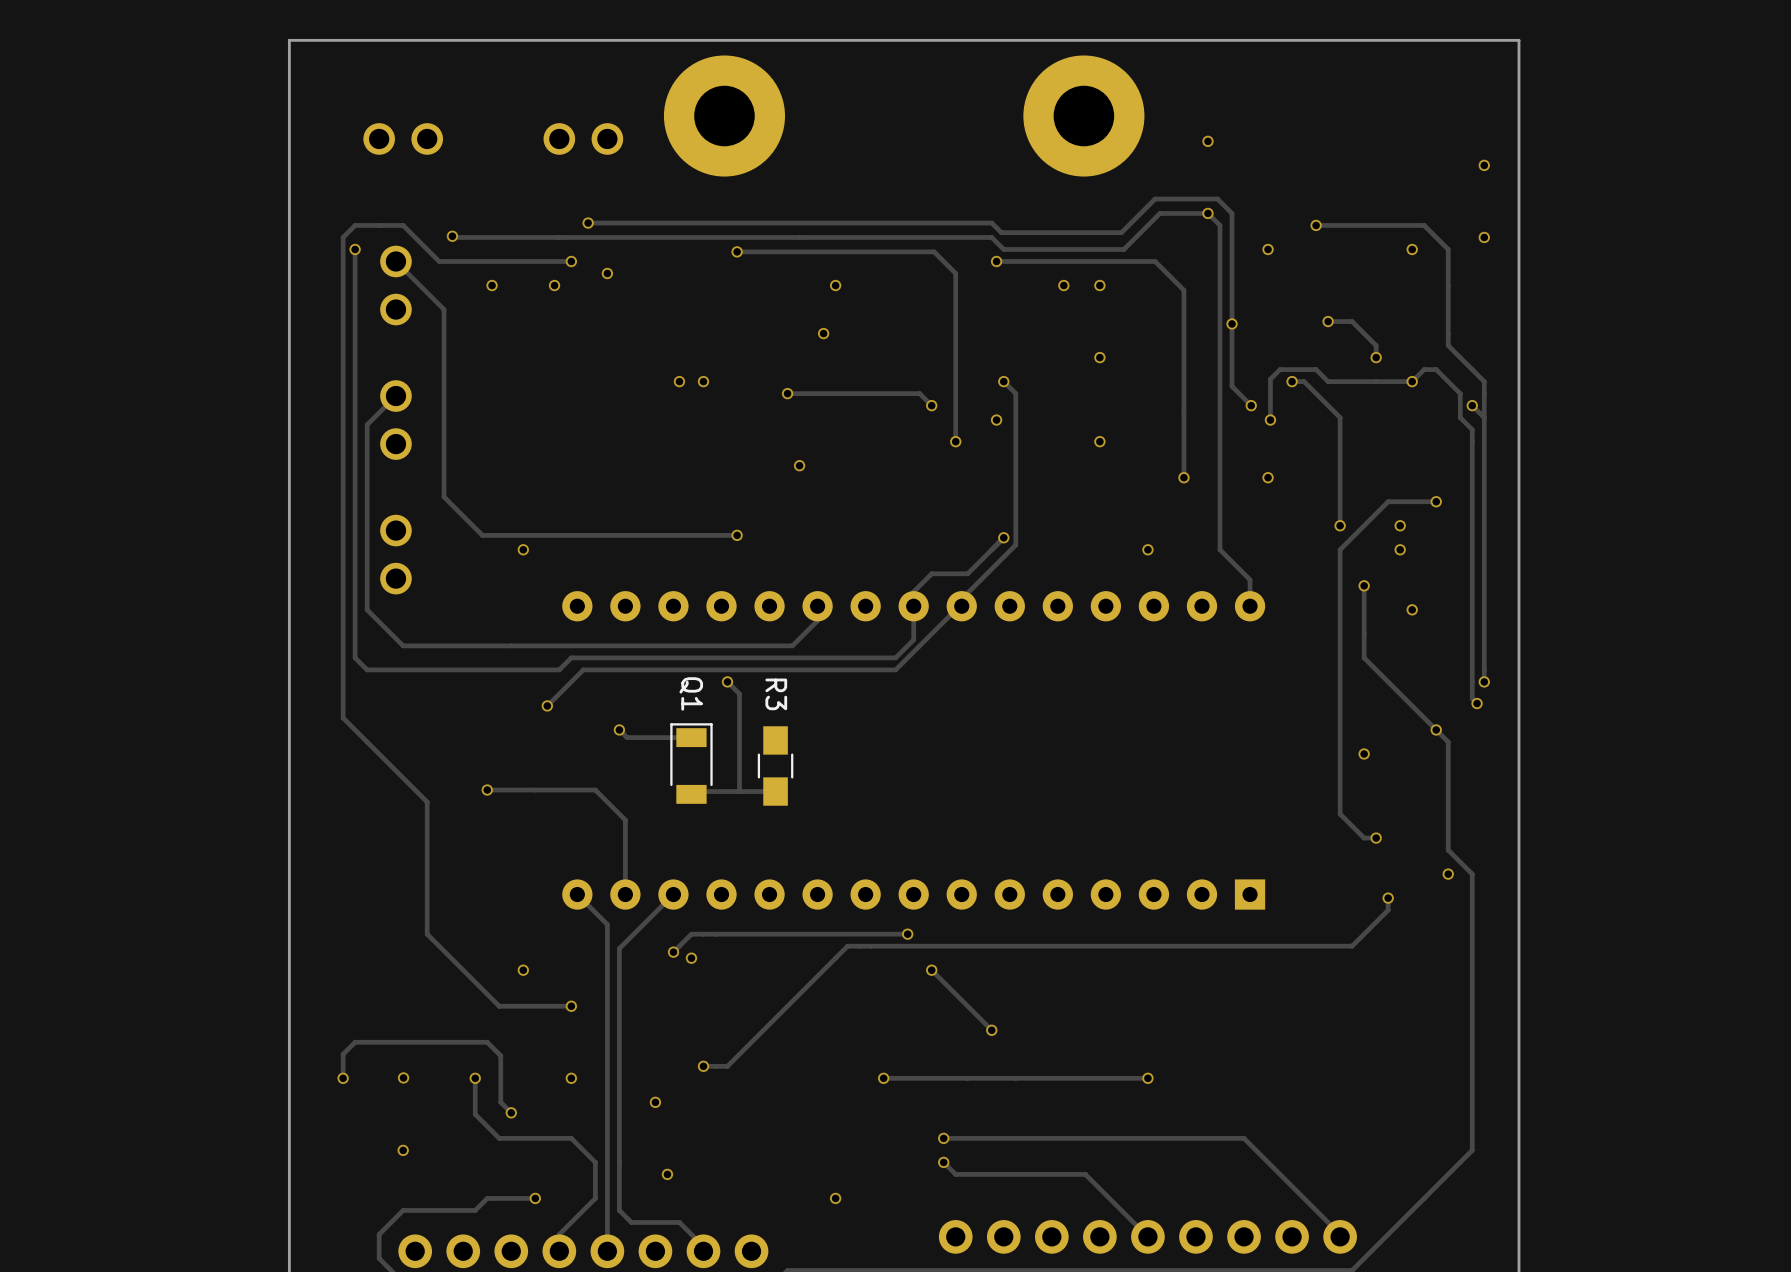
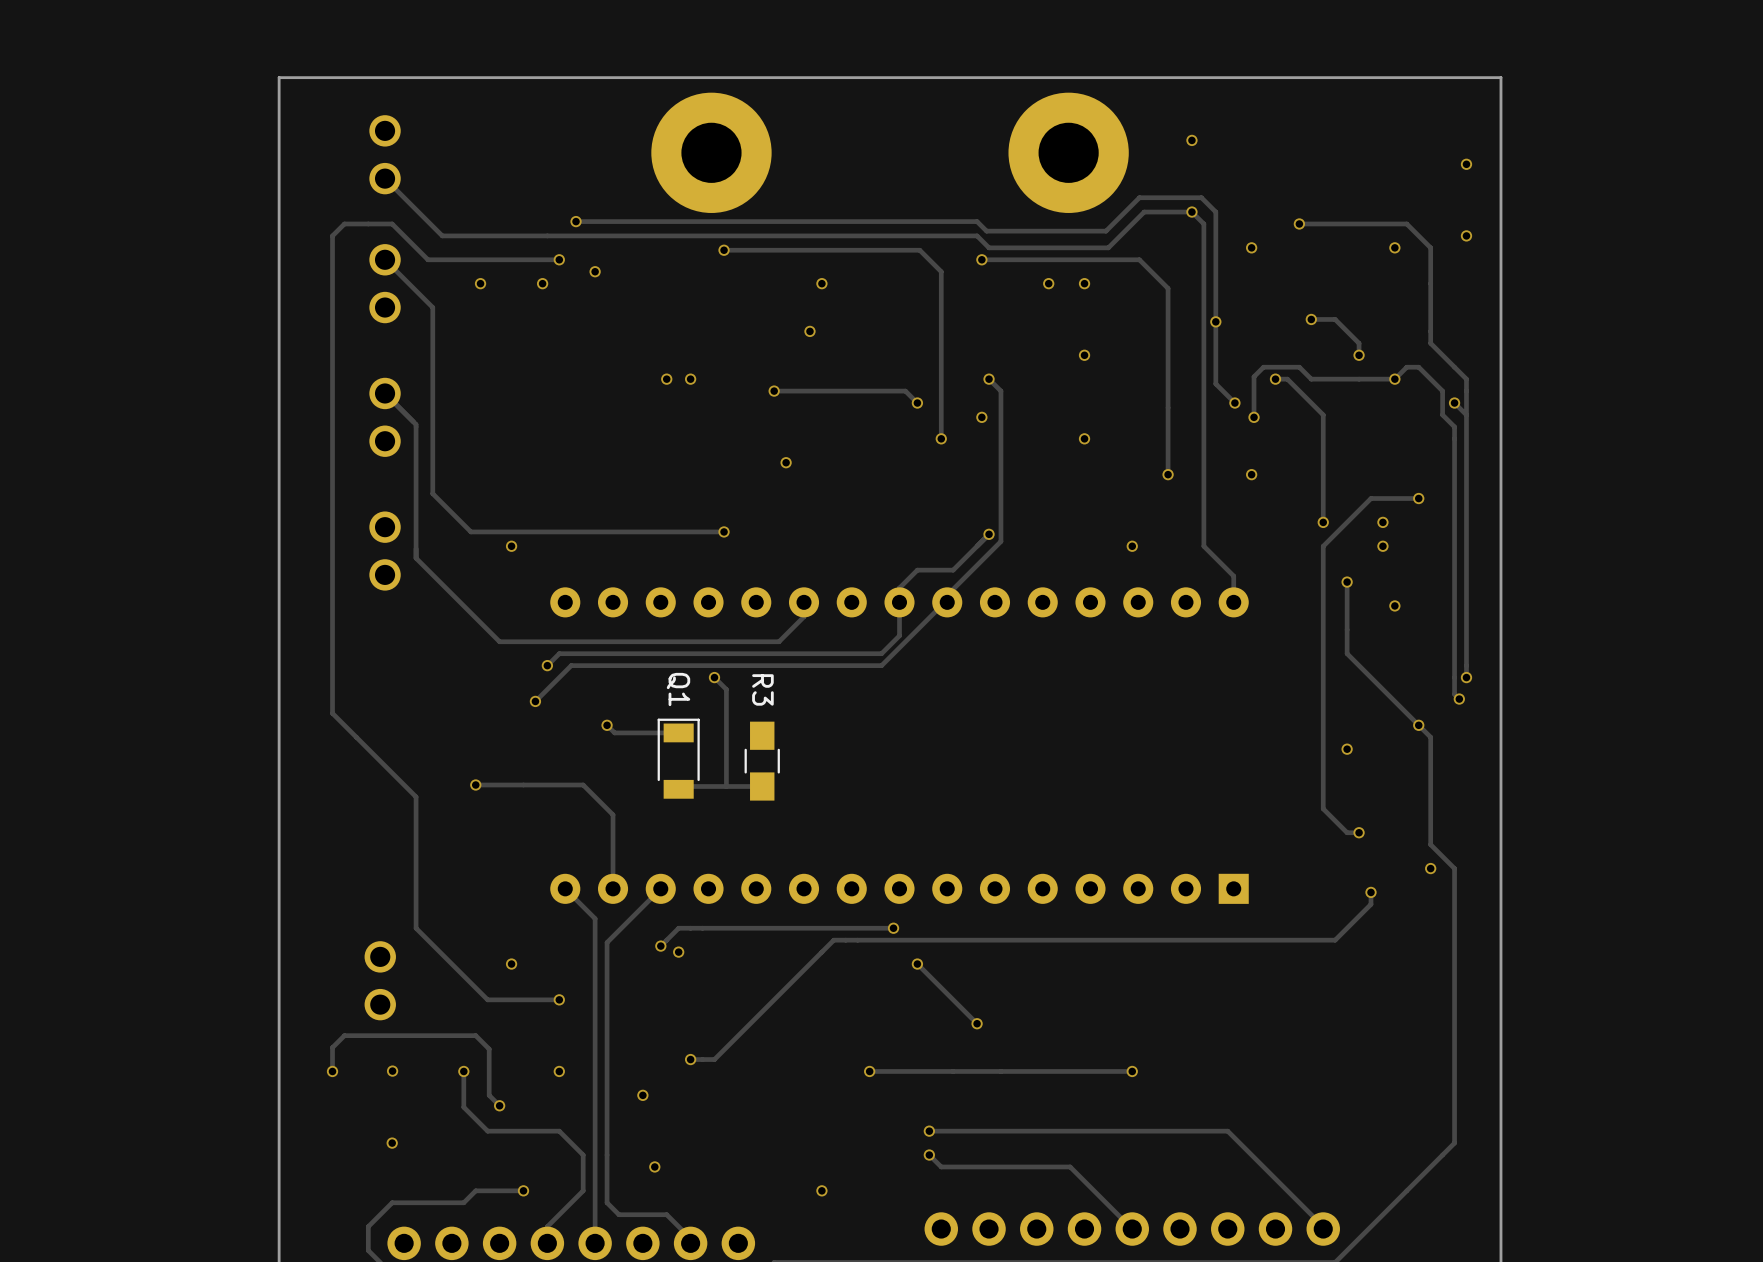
board edge: (1518, 78) (1518, 40) (289, 40) (289, 78) -> (1500, 77) (279, 77)
part position: (724, 116) -> (711, 152)
part position: (1083, 116) -> (1068, 152)
part rotation: 0° (403, 138) -> 90° clockwise (385, 154)
part: (583, 138) -> none
track: none -> (385, 178) (441, 234)
via: (452, 236) -> none
track: (355, 249) (355, 657) (367, 669) (559, 669) -> none
via: (355, 249) -> none
track: (395, 396) (367, 424) (367, 609) (403, 645) (511, 645) -> (385, 393) (416, 424) (416, 558) (499, 641)
via: none -> (547, 665)
part: none -> (380, 980)

